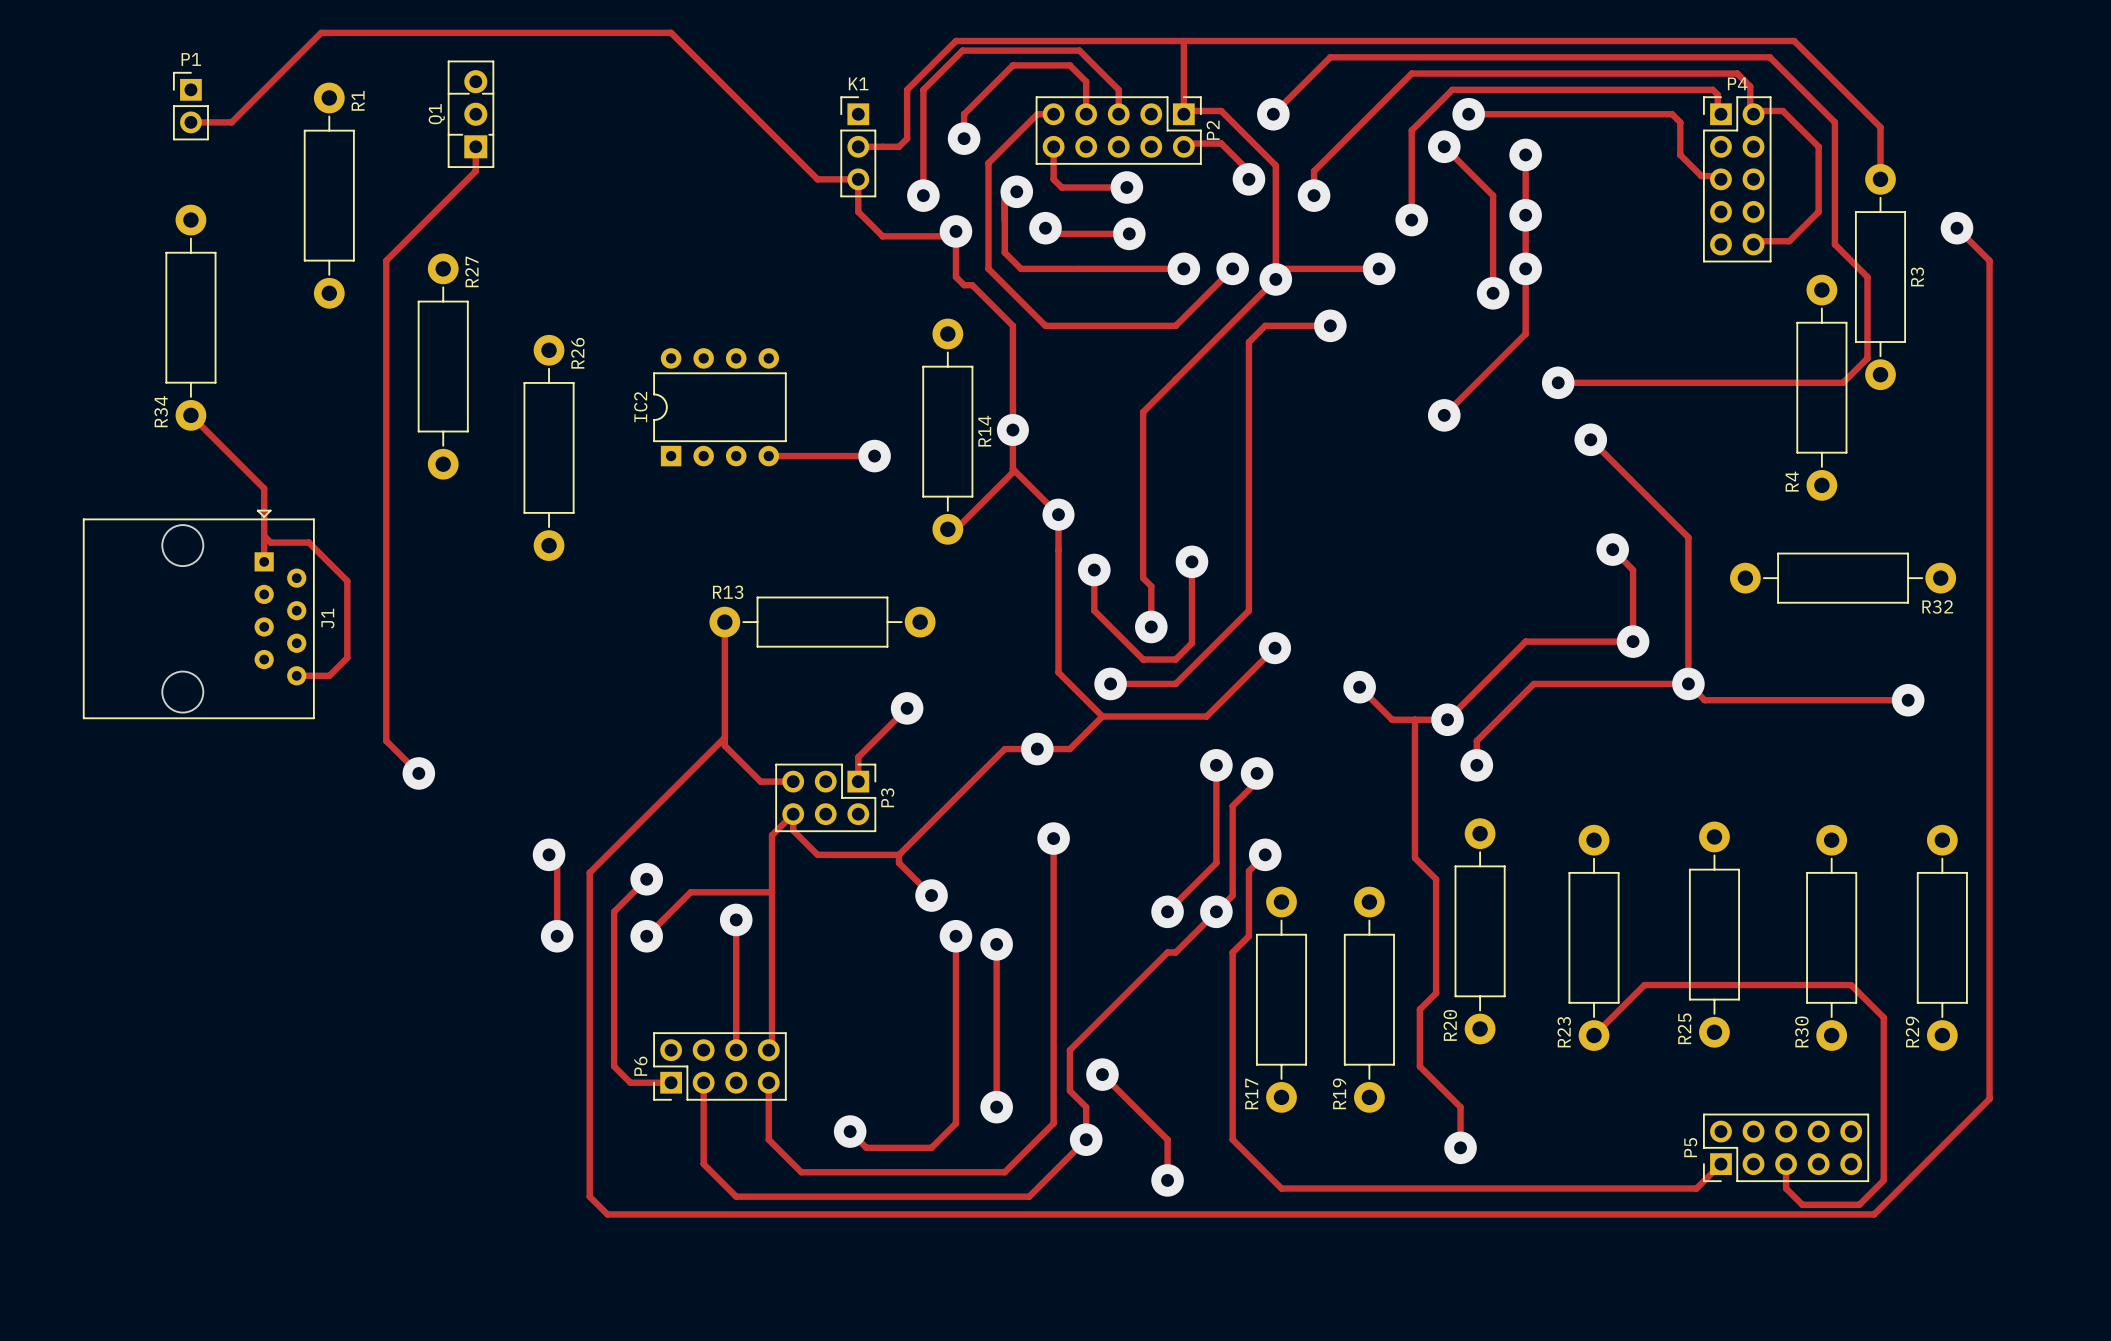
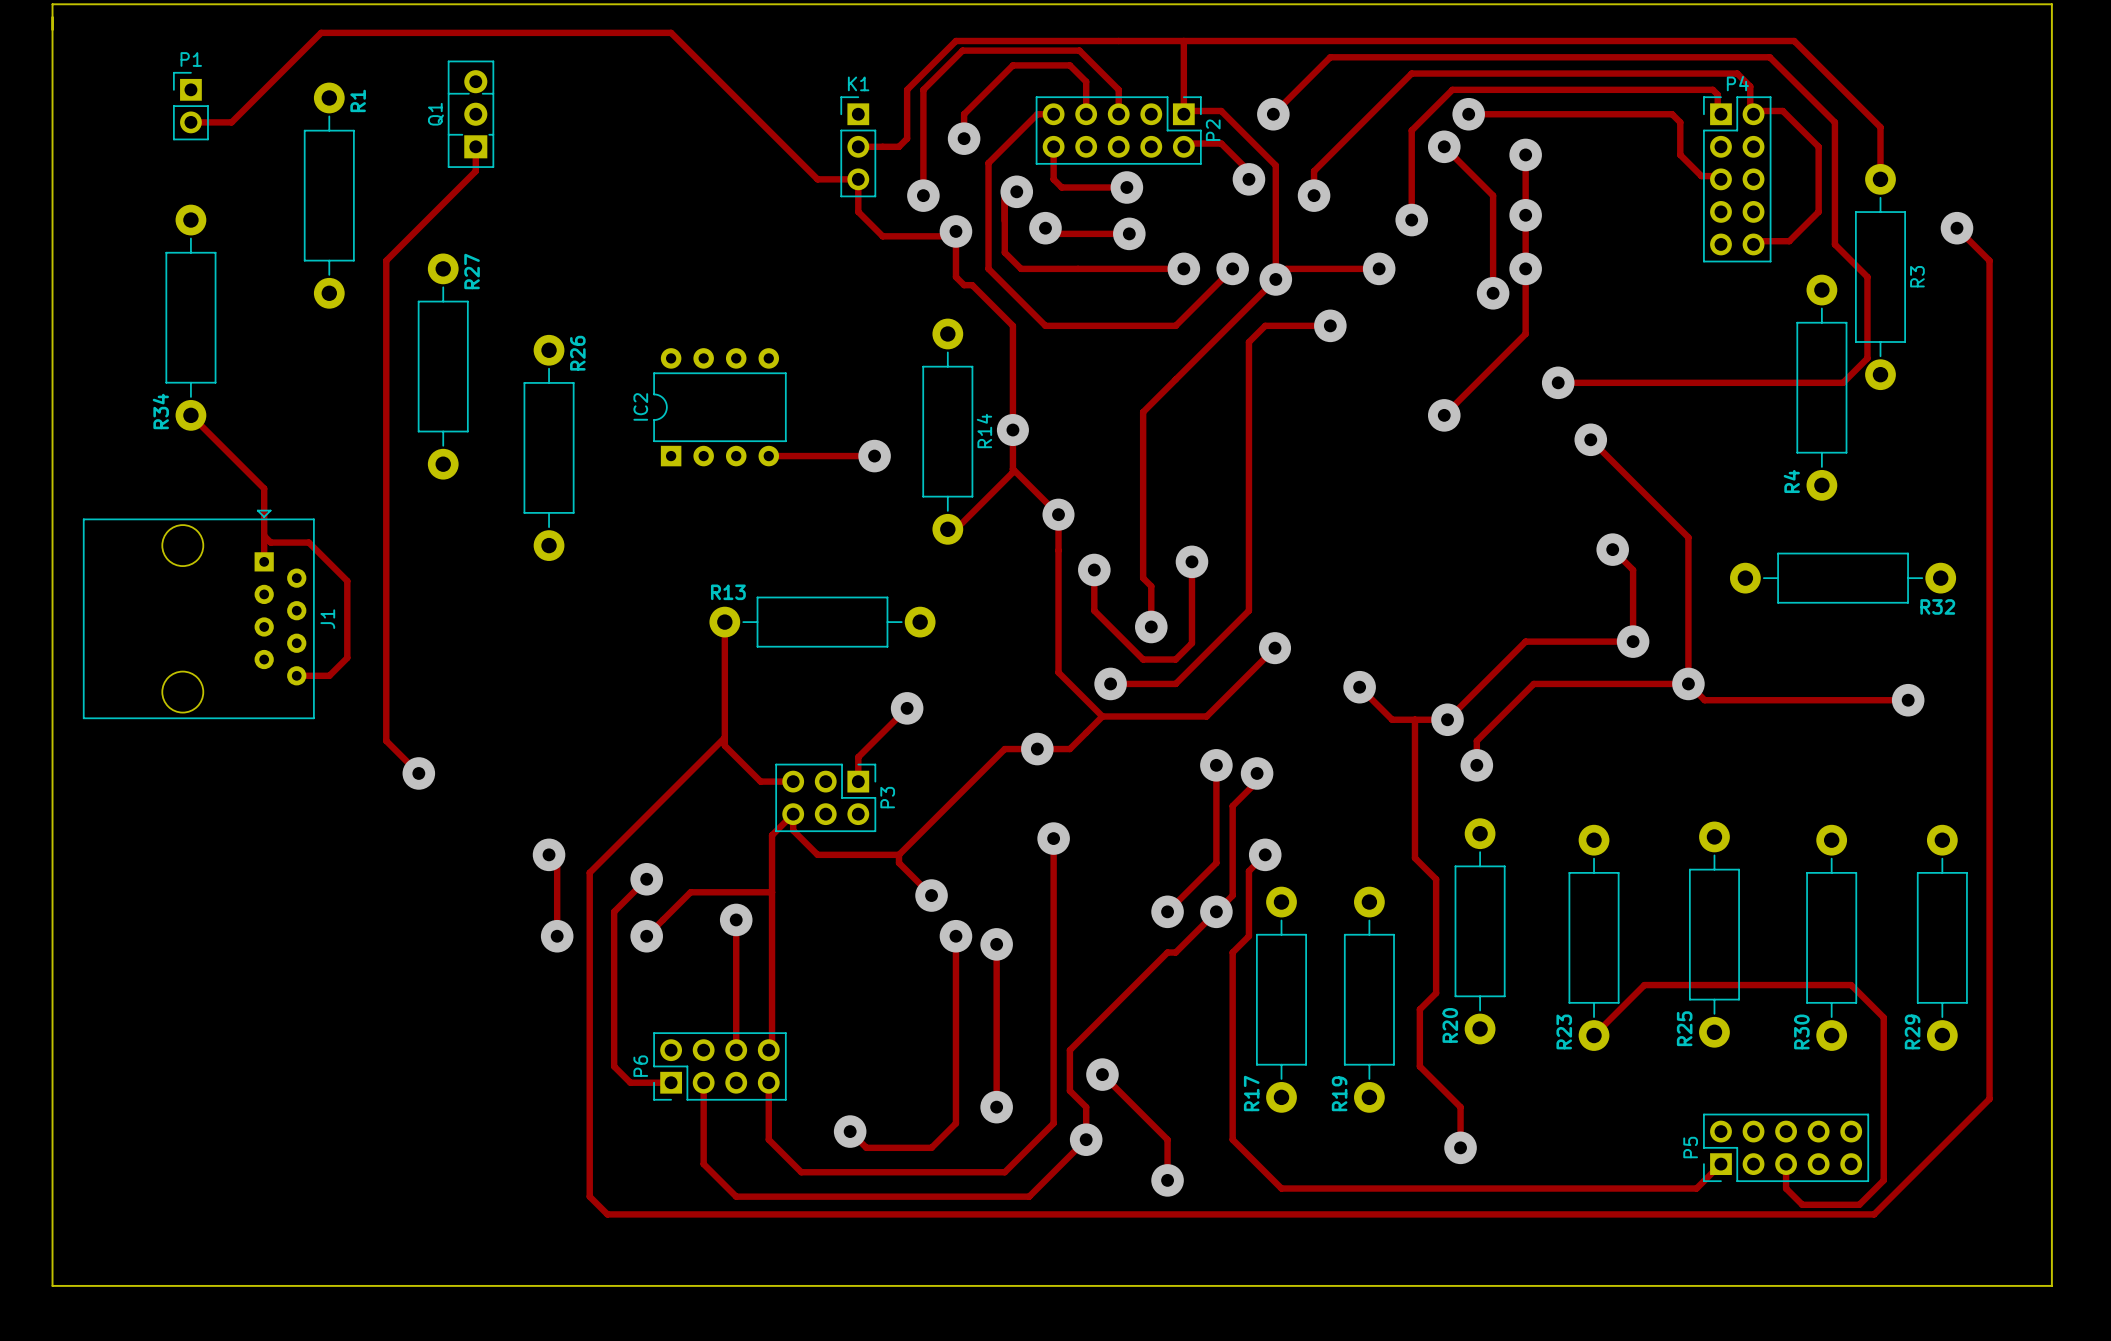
board edge: none -> (52, 4) (52, 1285) (2051, 1285) (2051, 4) (52, 4)

